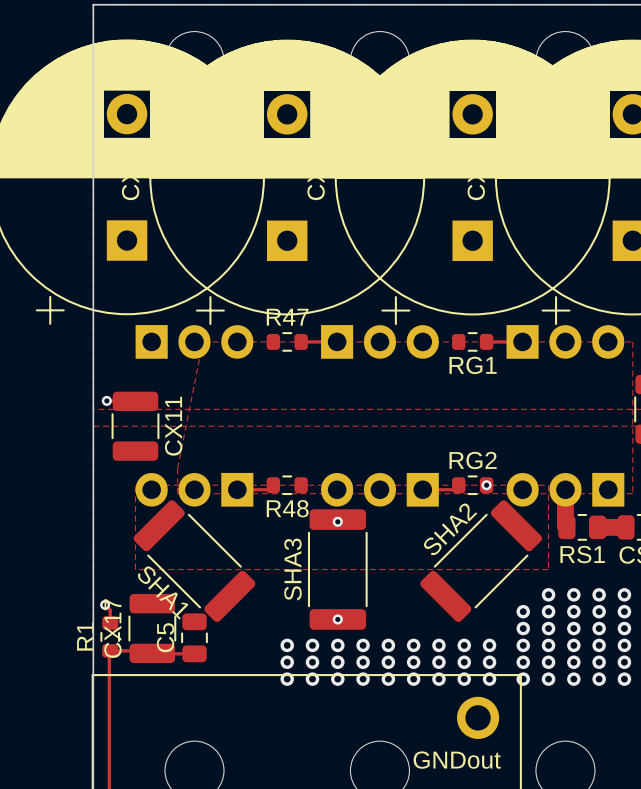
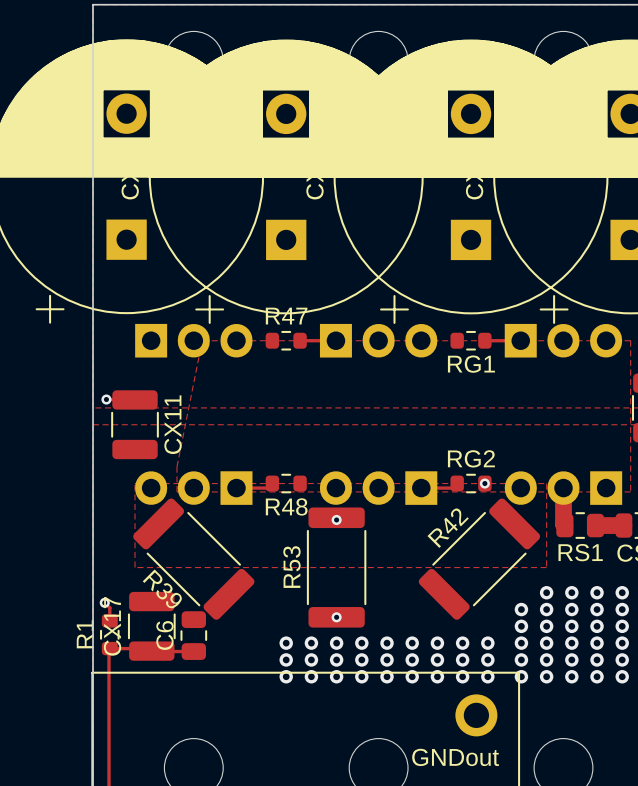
SHA2 name: SHA2 (450, 530) -> R42 (448, 528)
SHA3 name: SHA3 (292, 569) -> R53 (291, 567)
SHA1 name: SHA1 (162, 592) -> R39 (162, 589)
C5 name: C5 (165, 637) -> C6 (164, 635)

